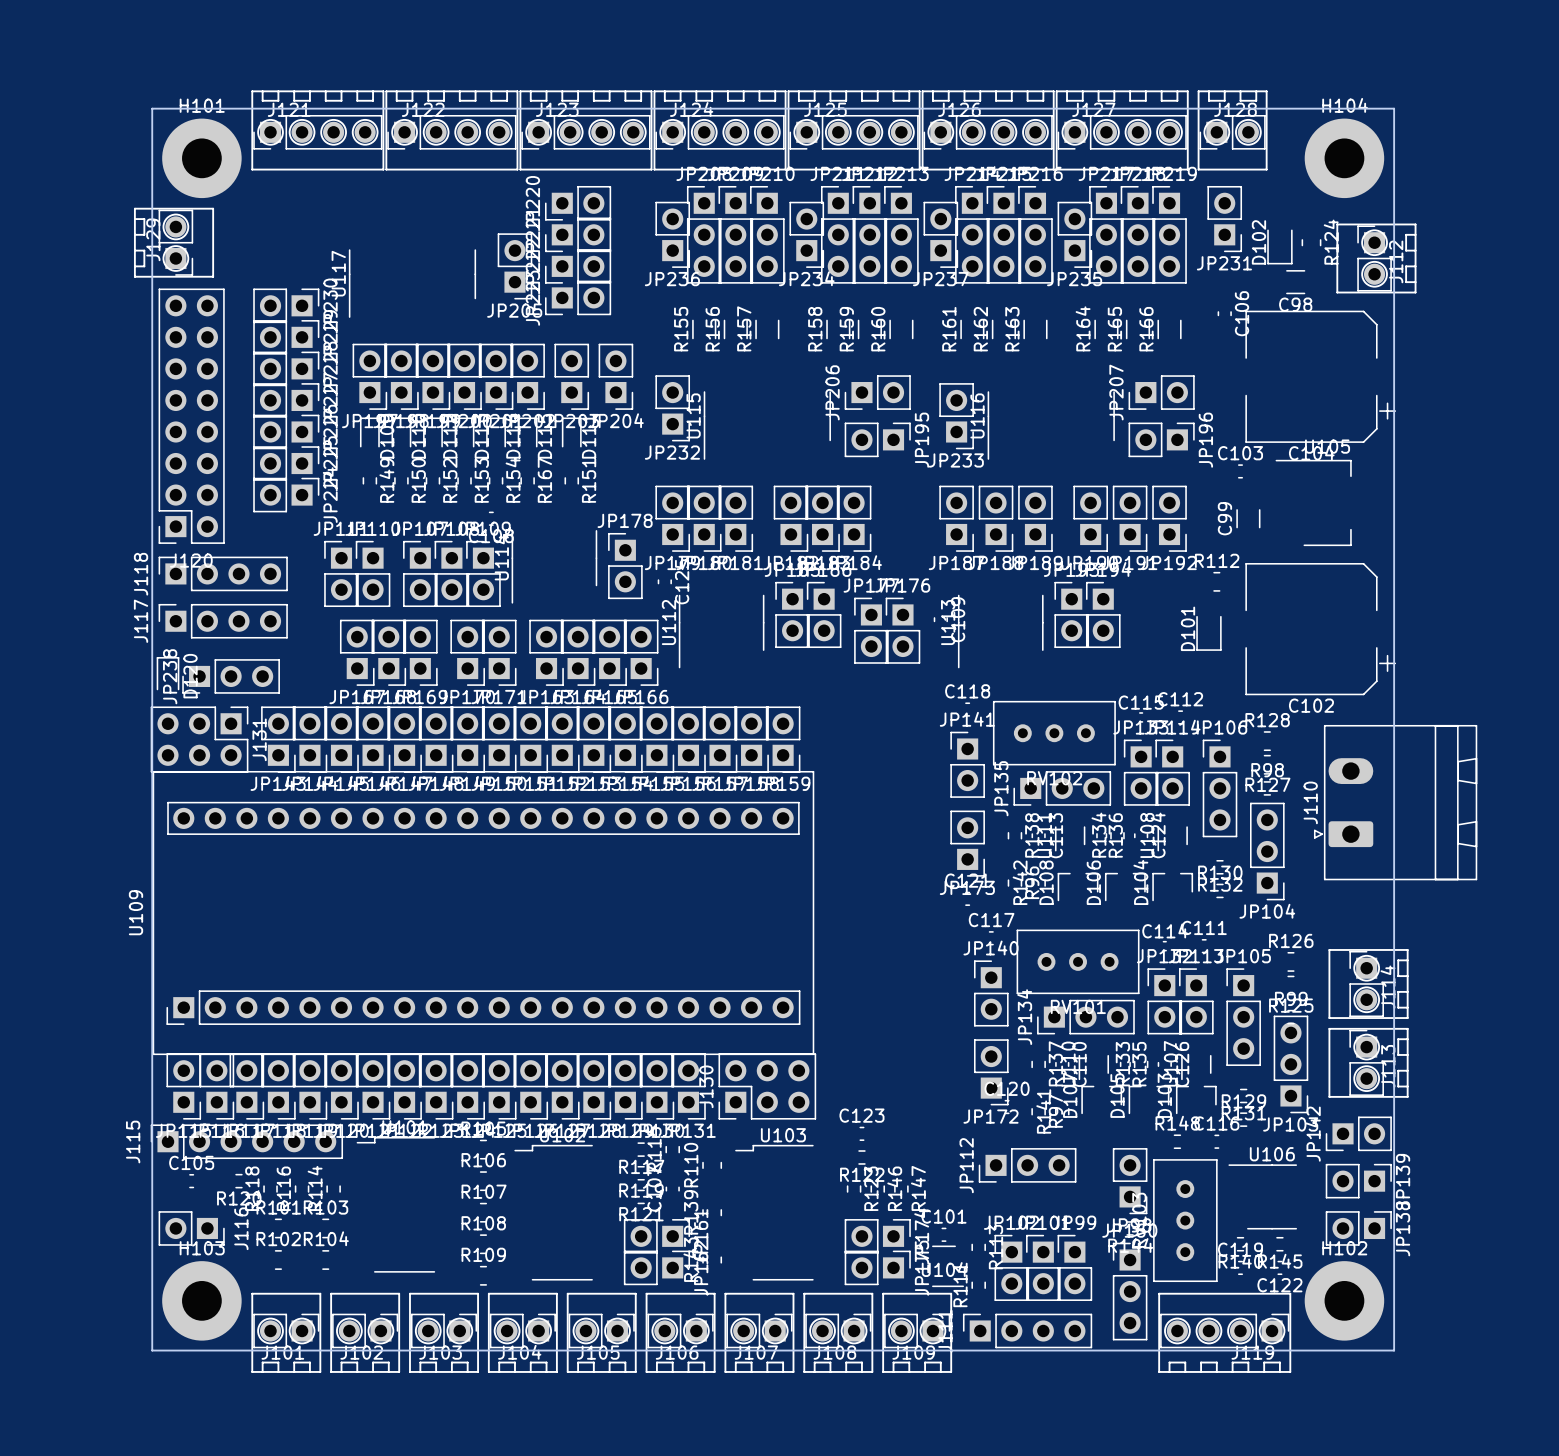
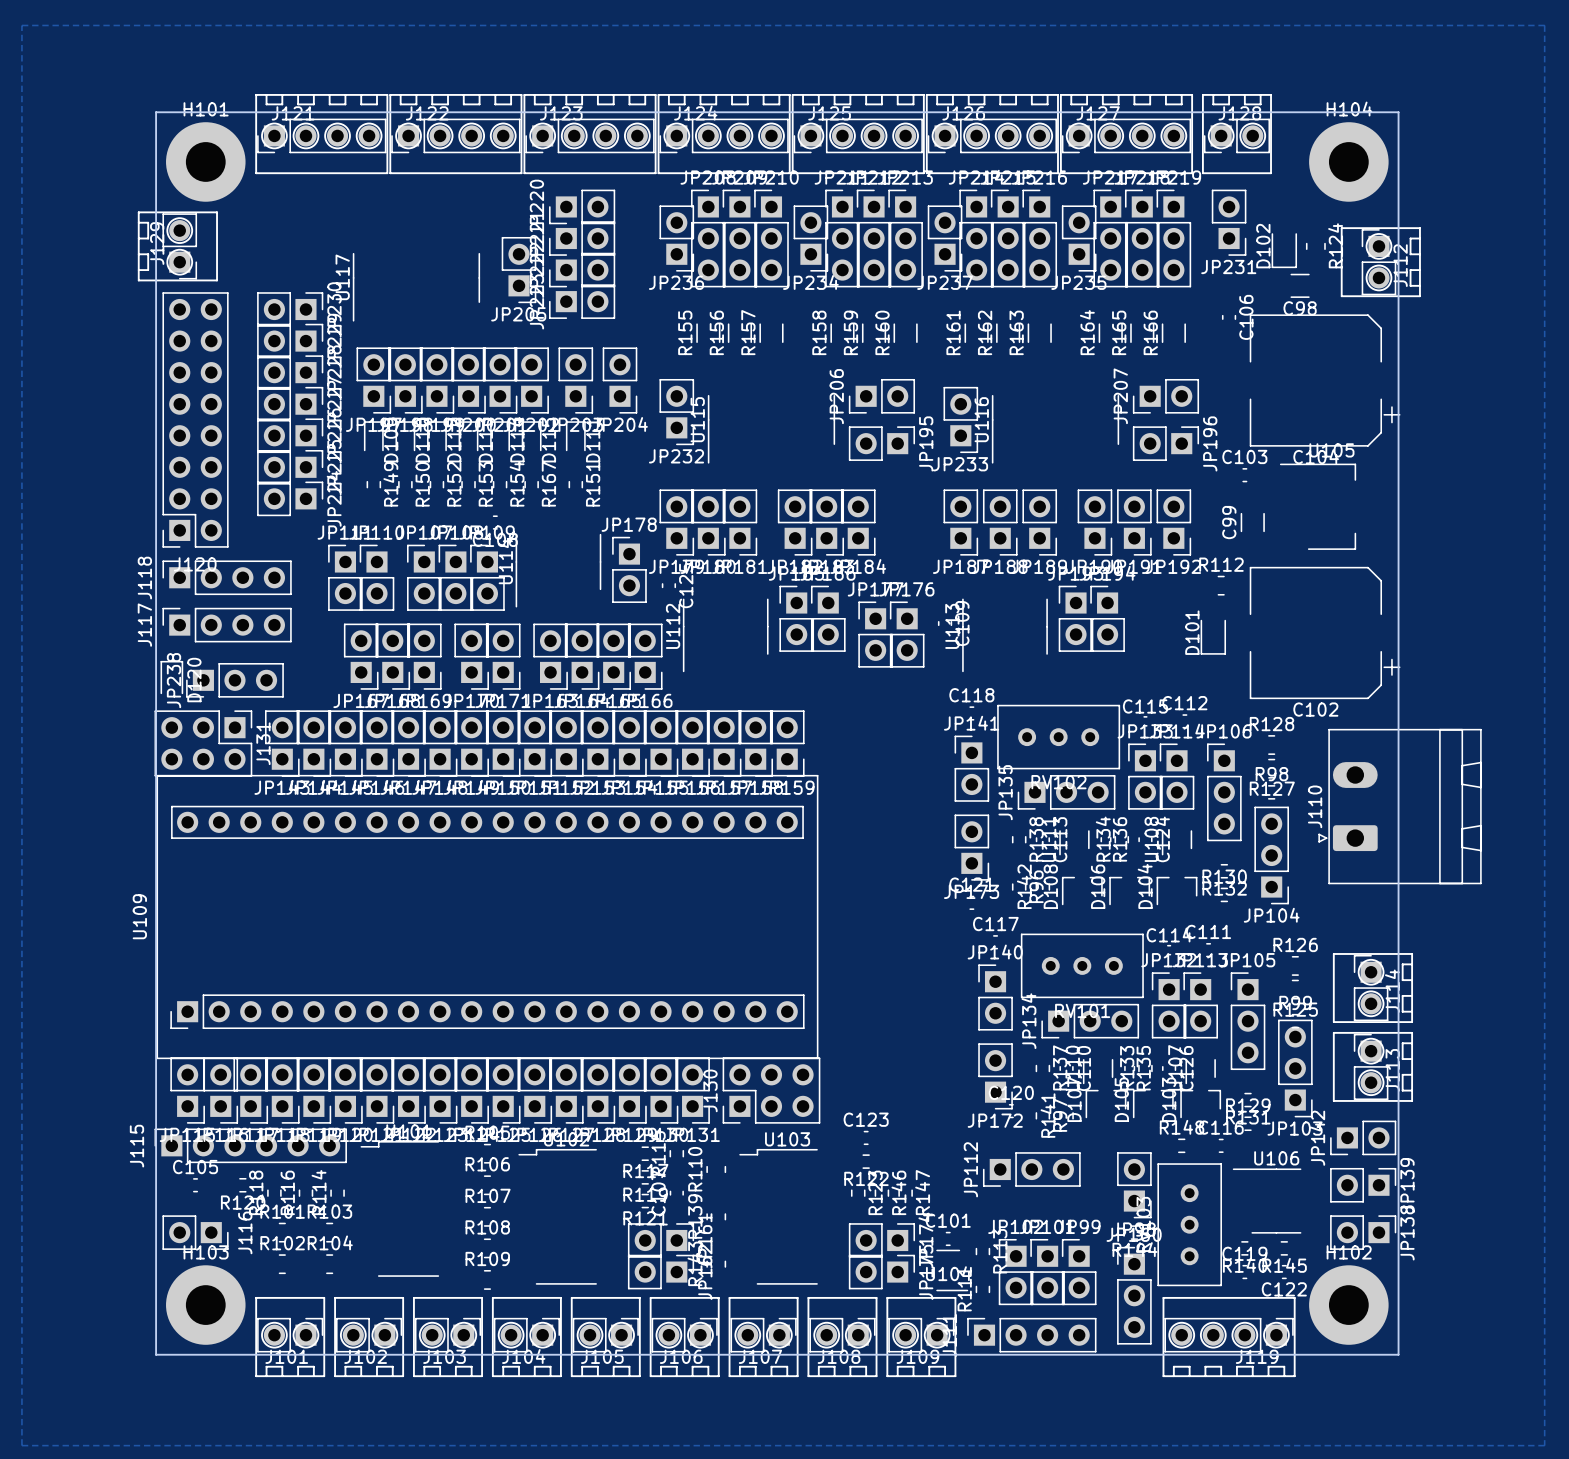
zone outline: none -> (21, 25) (21, 1445) (1544, 1445) (1544, 25) (21, 25)

